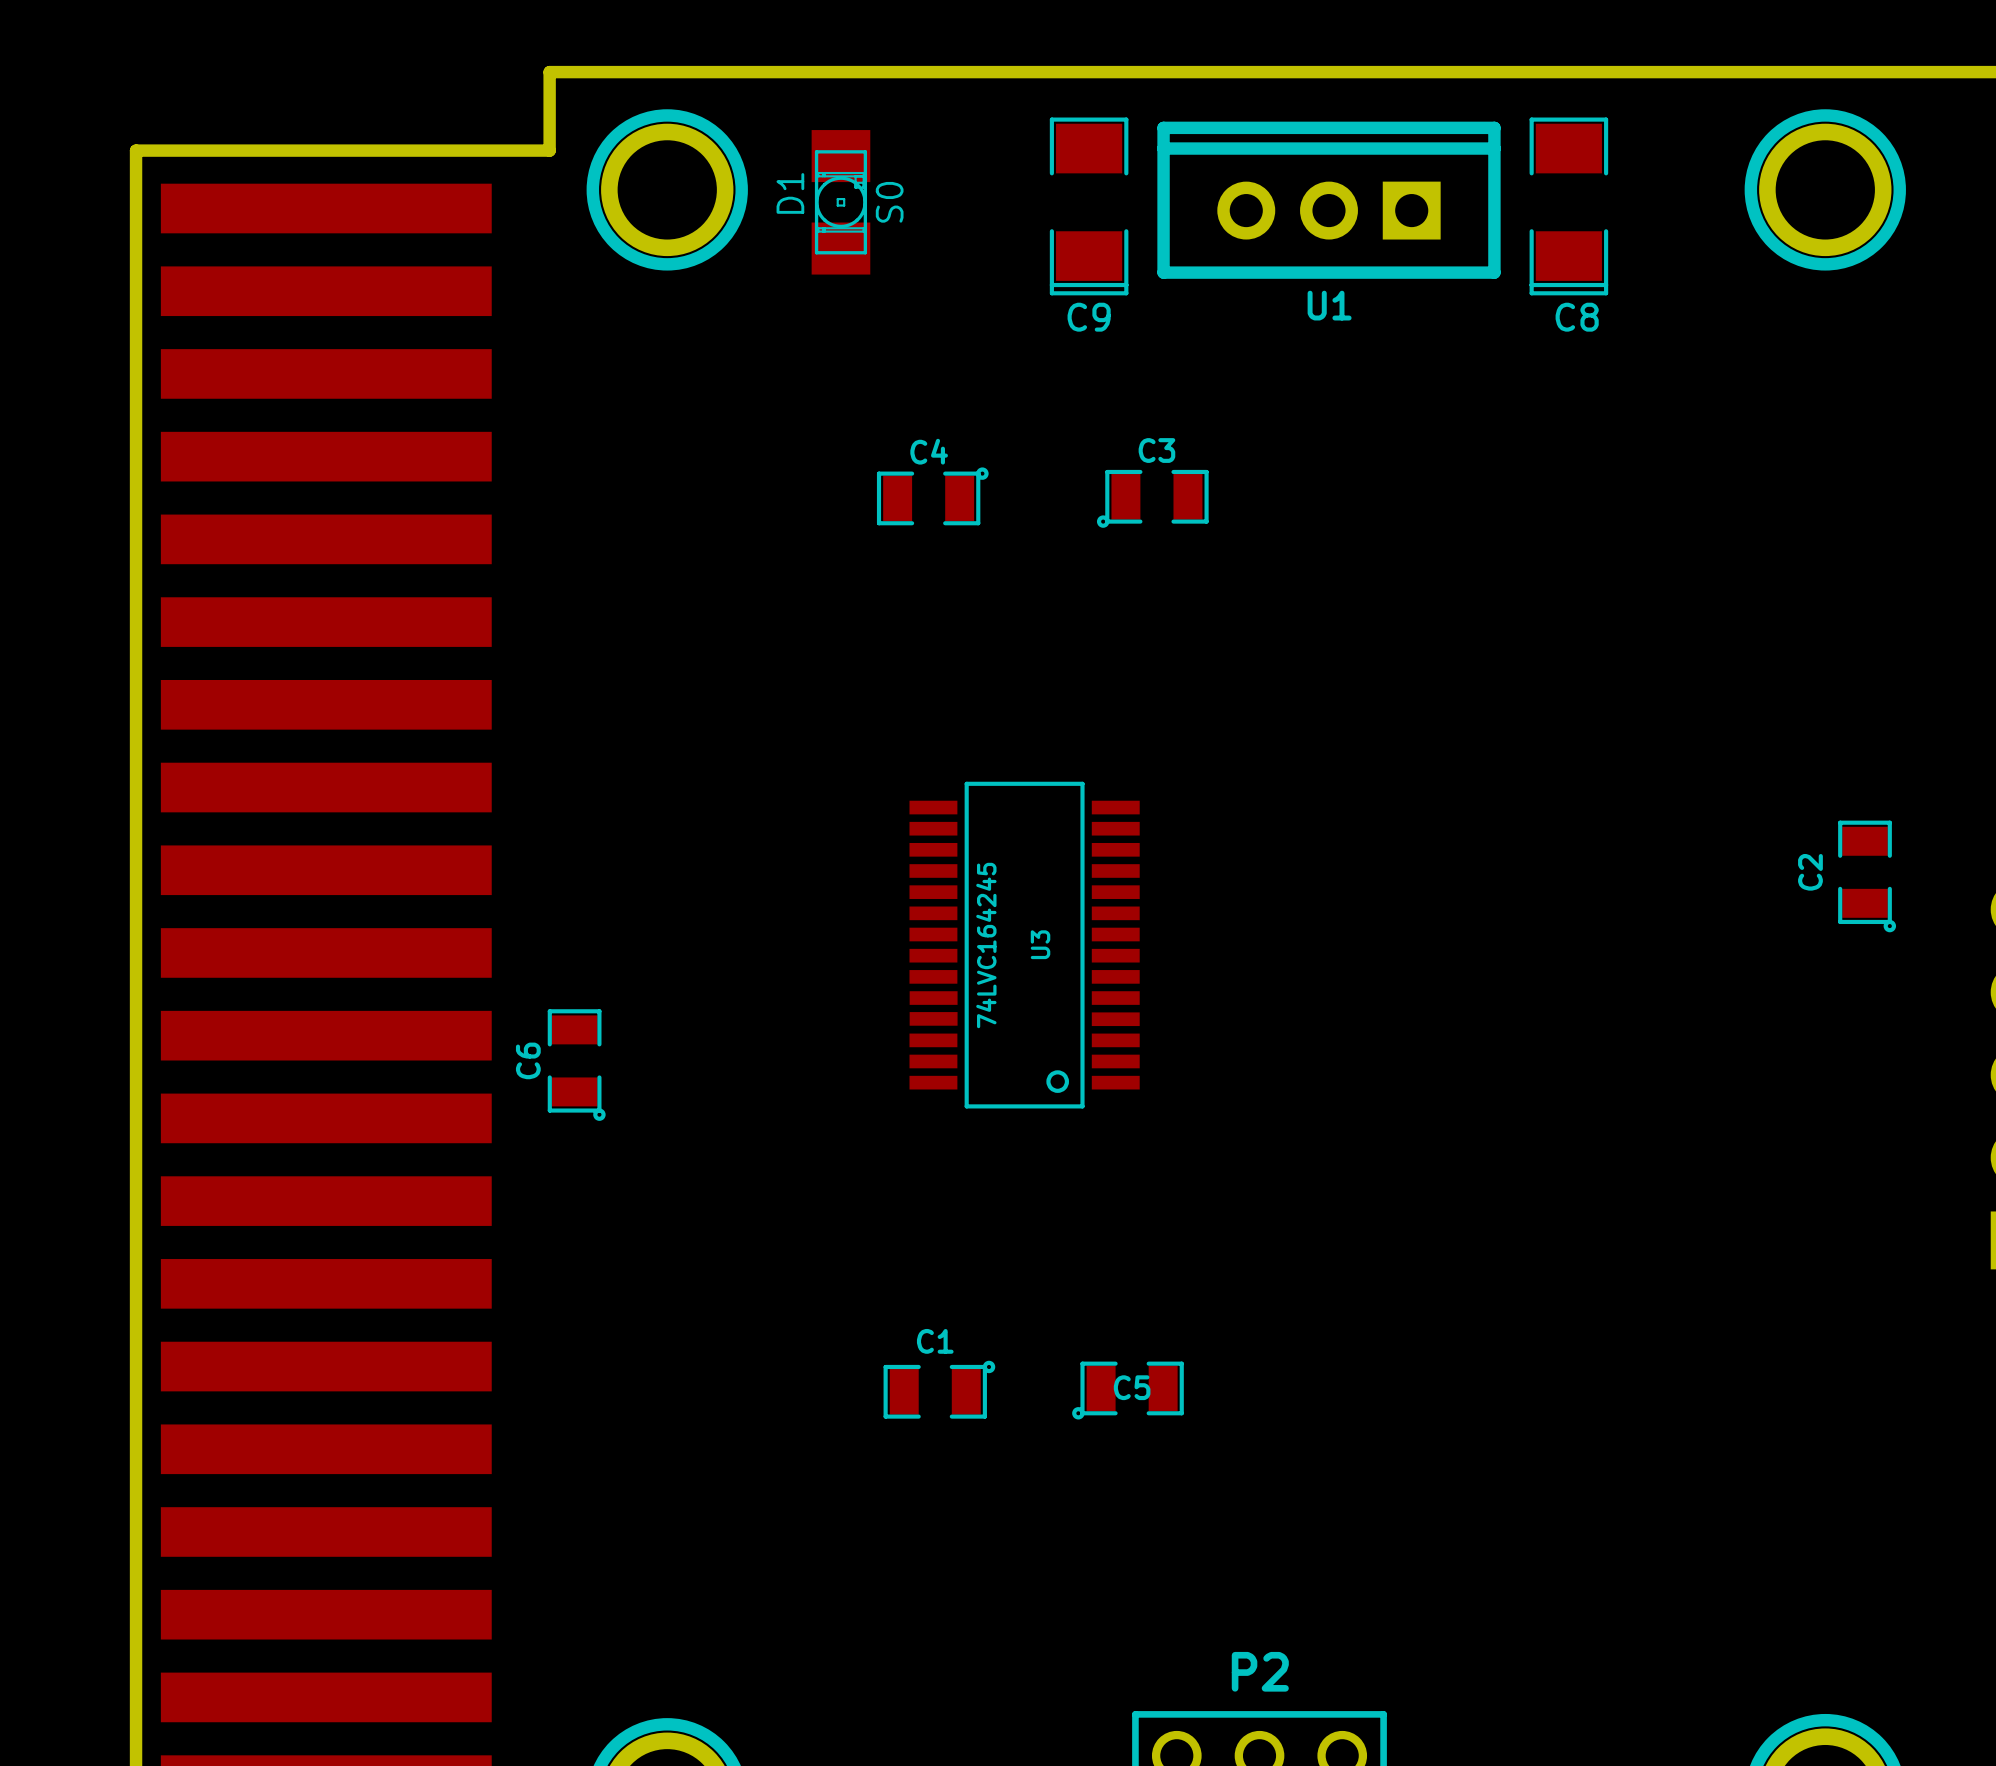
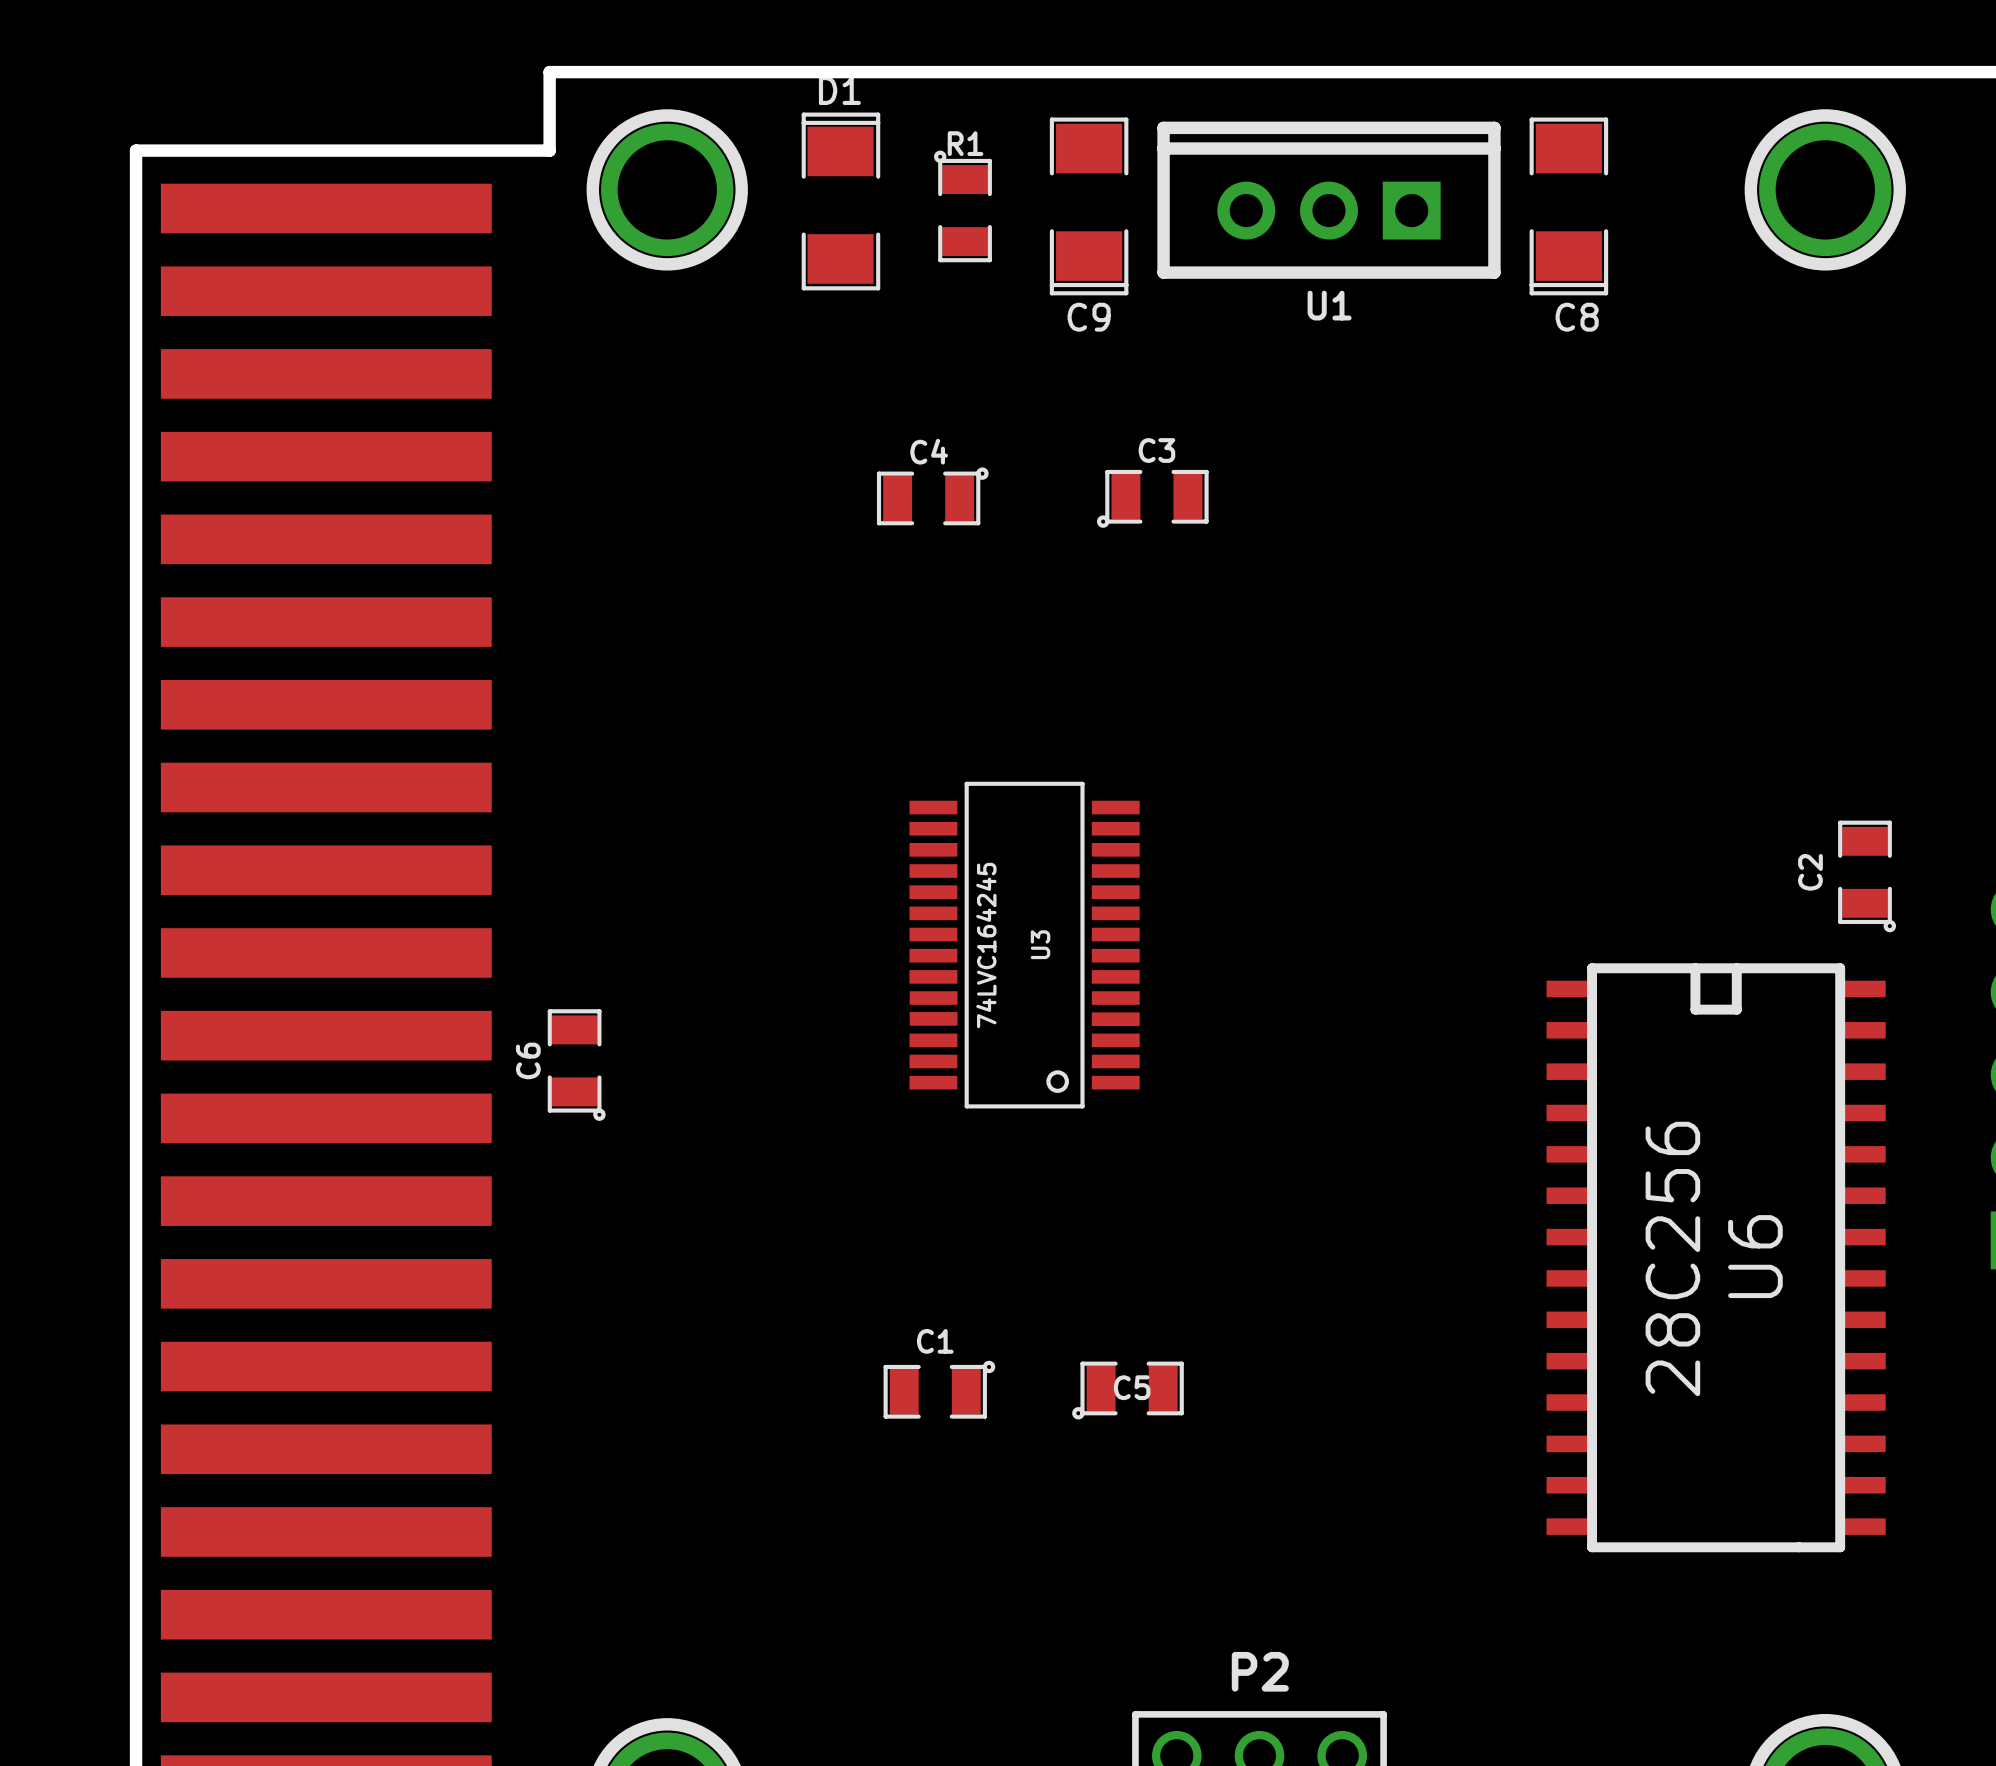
D1 footprint: [811, 130, 871, 275] -> [801, 112, 881, 291]
D1 name position: D1 (790, 193) -> D1 (839, 90)
D1 value: S0 (889, 202) -> none
R1: none -> (962, 206)
U6: none -> 28C256 (1716, 1257)

